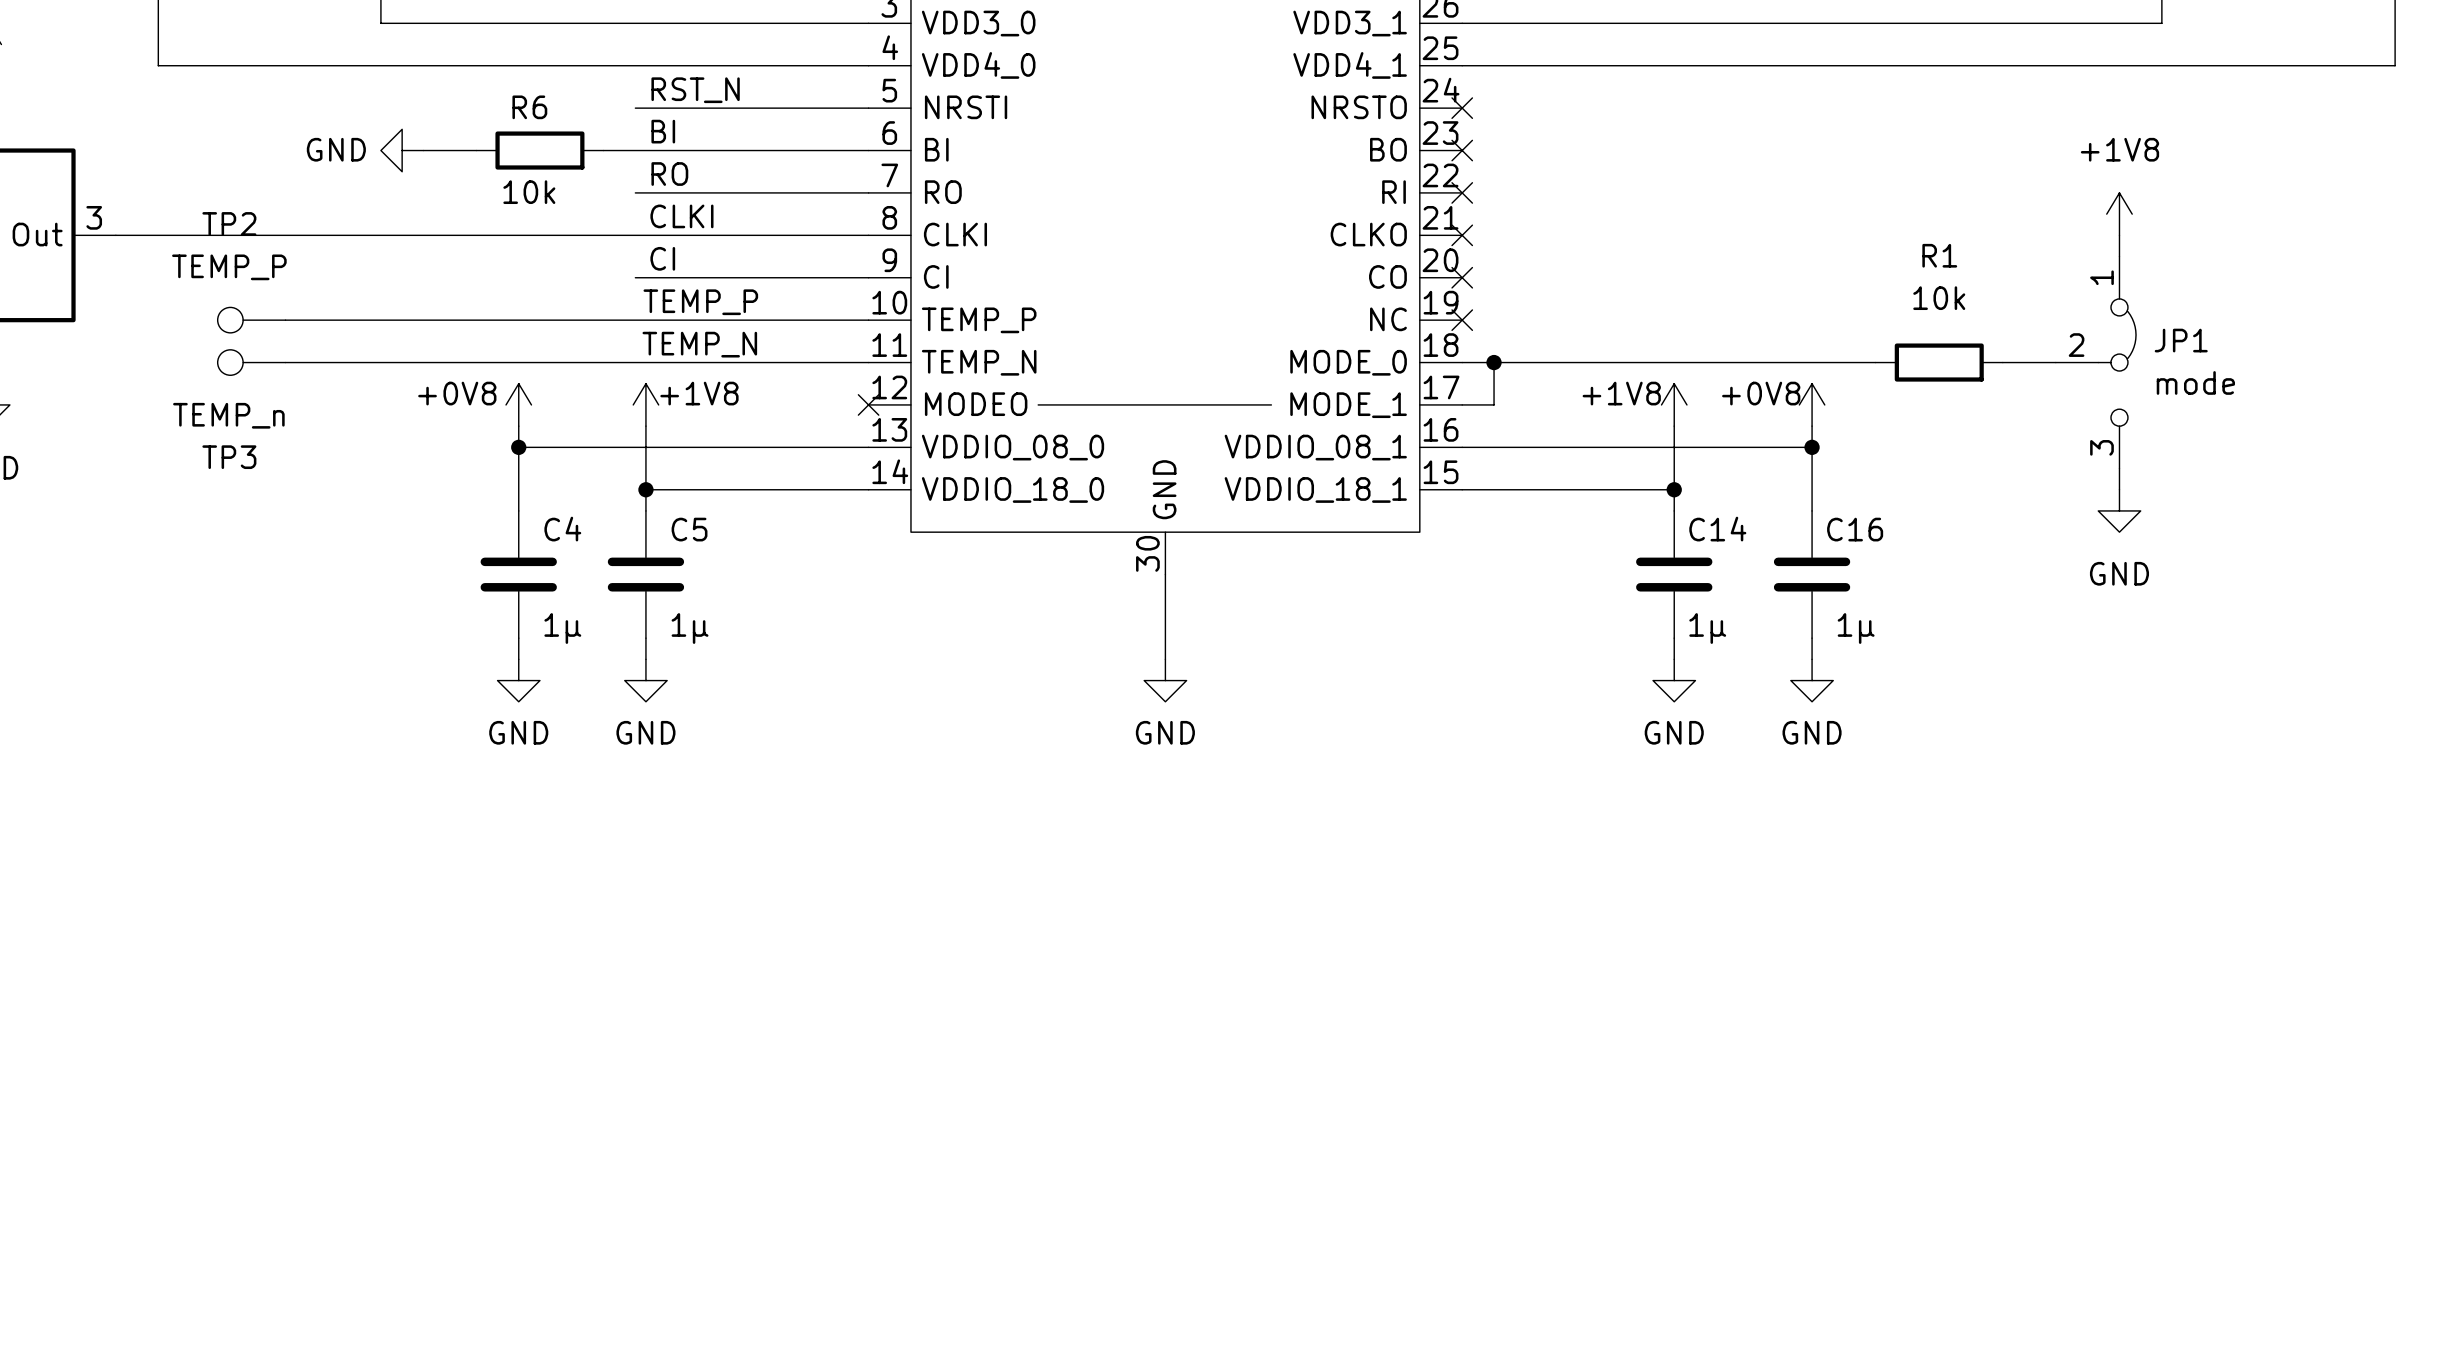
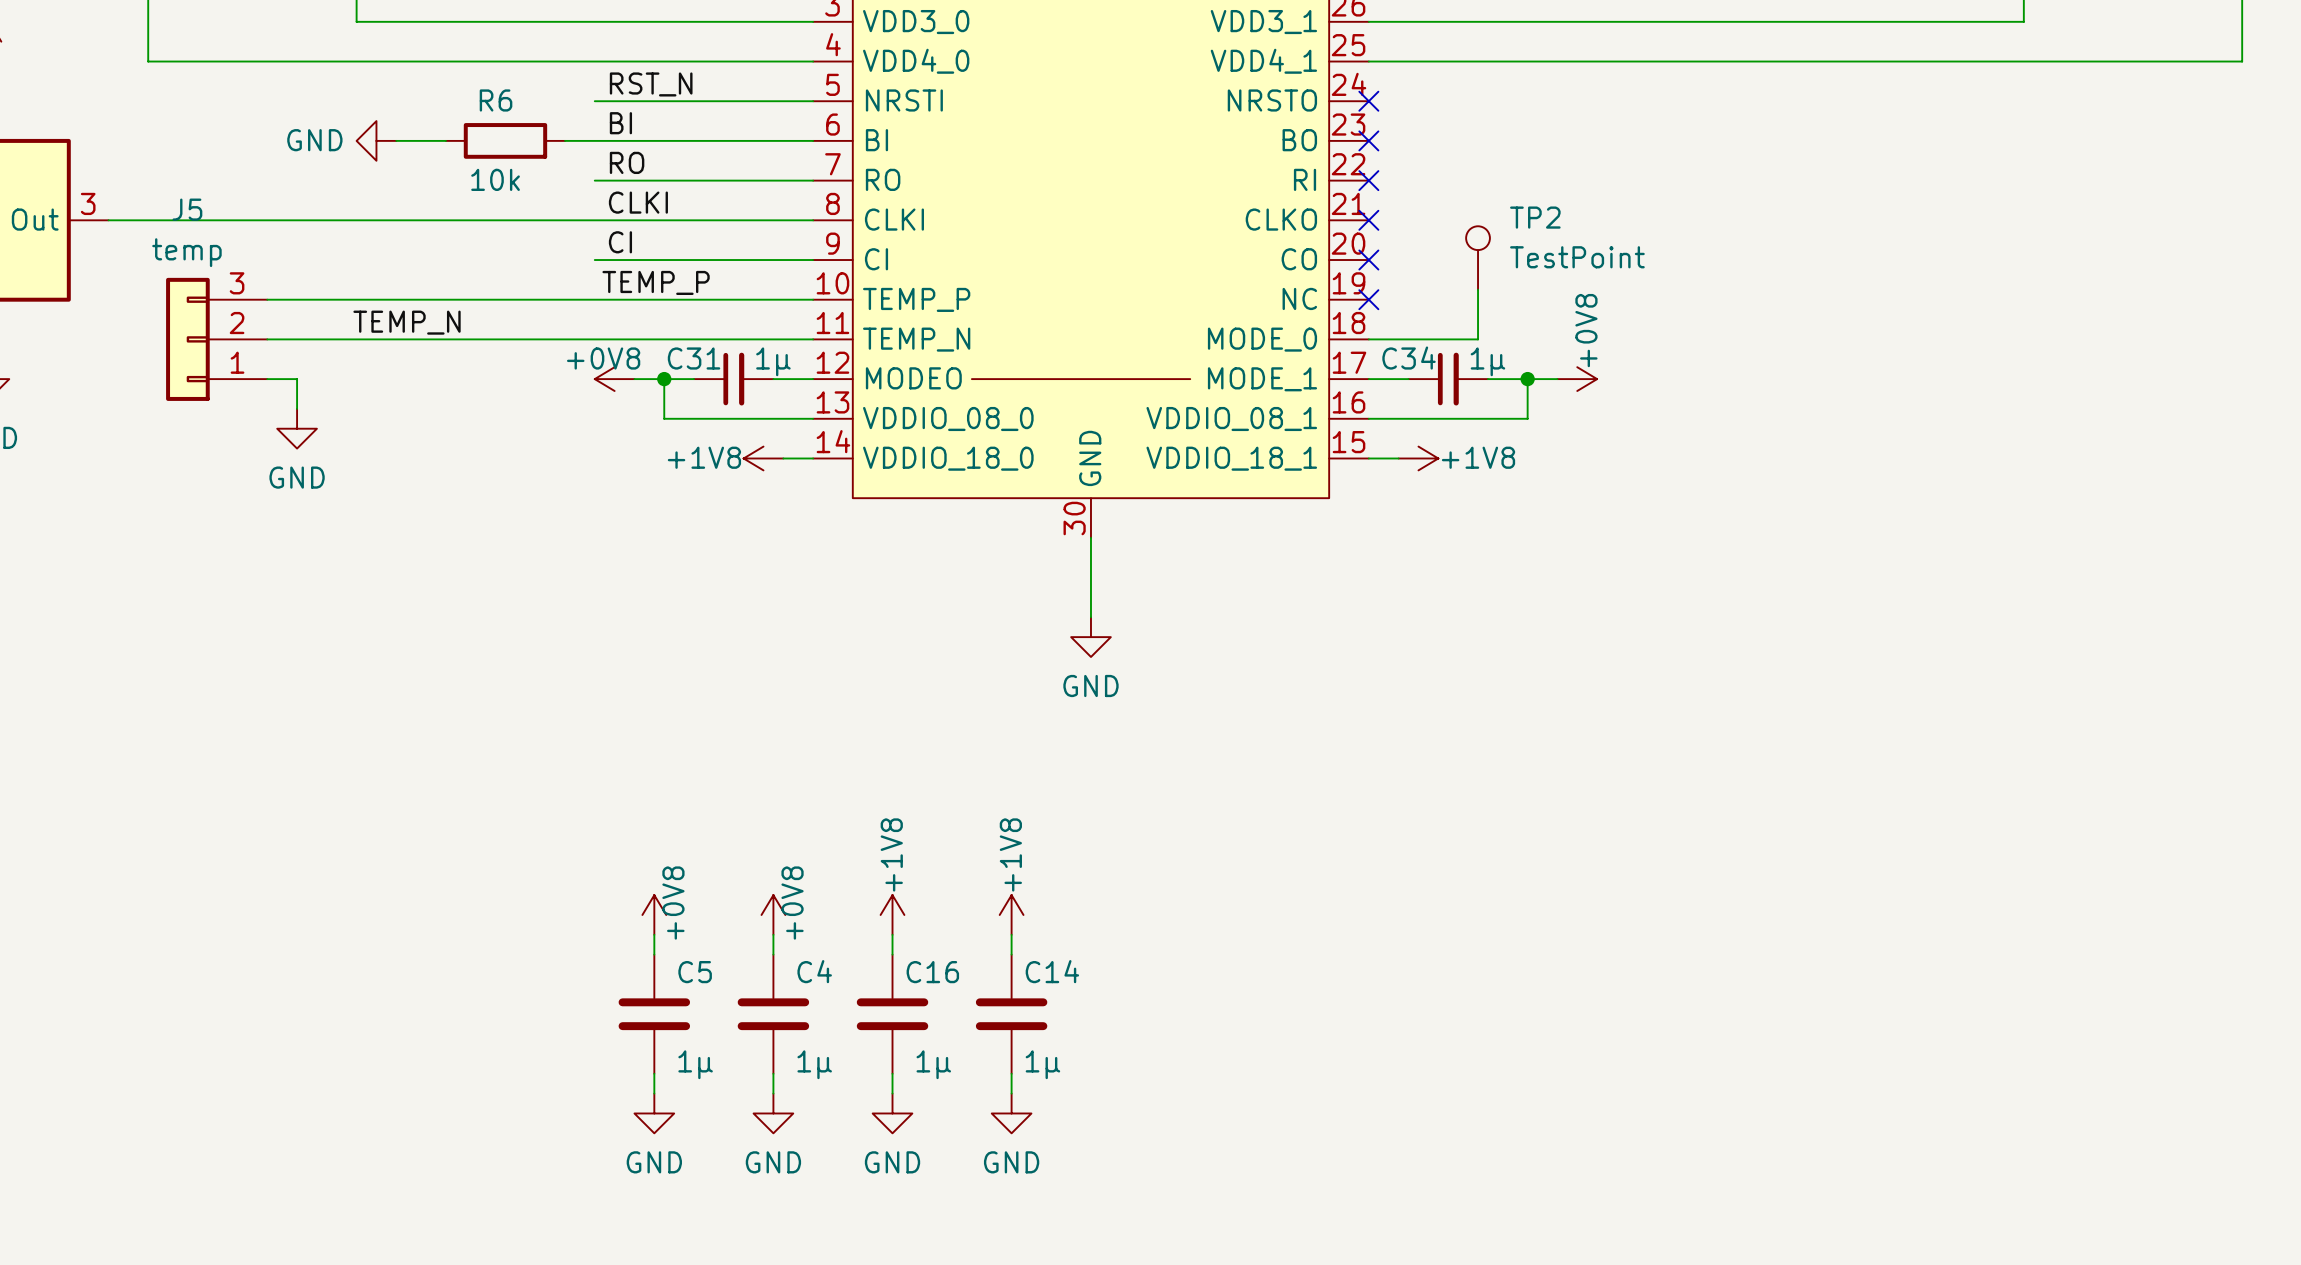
power symbol: +1V8 (2119, 214) -> none
TP2 name position: TP2 (229, 223) -> TP2 (1535, 217)
wire: (2119, 235) (2119, 256) -> none
TP2 value: TEMP_P (229, 267) -> TestPoint (1577, 257)
TP2 rotation: 0° (230, 320) -> 90° clockwise (1478, 238)
TP2 position: (251, 320) -> (1478, 258)
label position: TEMP_N (699, 344) -> TEMP_N (407, 322)
J5: none -> temp (216, 339)
TP3: TEMP_n (251, 362) -> none
wire: (1494, 362) (1494, 404) -> (1408, 379) (1398, 379)
junction: (1494, 362) -> none
wire: (1578, 362) (1875, 362) -> (1478, 339) (1478, 289)
R1: 10k (1939, 362) -> none
wire: (2002, 362) (2055, 362) -> none
JP1: mode (2095, 362) -> none
part value position: +0V8 (457, 393) -> +0V8 (603, 358)
power symbol text position: +1V8 (699, 393) -> +1V8 (704, 457)
power symbol text position: +1V8 (1621, 393) -> +1V8 (1478, 457)
wire: none -> (267, 379) (297, 379) (297, 408)
part rotation: 0° (518, 404) -> 90° counterclockwise (614, 379)
part position: (518, 404) -> (614, 379)
power symbol rotation: 0° (645, 404) -> 90° counterclockwise (763, 458)
power symbol position: +1V8 (645, 404) -> +1V8 (763, 458)
wire: none -> (634, 379) (694, 379)
junction: none -> (664, 379)
C31: none -> 1µ (733, 379)
wire: none -> (773, 379) (813, 379)
no-connect mark: (868, 404) -> none
C34: none -> 1µ (1448, 379)
wire: none -> (1487, 379) (1557, 379)
junction: none -> (1527, 379)
power symbol rotation: 0° (1674, 404) -> 90° clockwise (1418, 458)
power symbol position: +1V8 (1674, 404) -> +1V8 (1418, 458)
part rotation: 0° (1812, 404) -> 90° clockwise (1577, 379)
part position: (1812, 404) -> (1577, 379)
wire: (518, 426) (518, 510) -> none
wire: (645, 426) (645, 510) -> none
wire: (1674, 426) (1674, 510) -> none
wire: (1812, 426) (1812, 510) -> none
wire: (518, 447) (709, 447) -> (664, 379) (664, 418)
junction: (518, 447) -> none
wire: (1631, 447) (1812, 447) -> (1527, 418) (1527, 379)
junction: (1812, 447) -> none
power symbol: none -> GND (297, 428)
wire: (2119, 468) (2119, 489) -> none
wire: (645, 489) (836, 489) -> none
junction: (645, 489) -> none
wire: (1494, 489) (1674, 489) -> none
junction: (1674, 489) -> none
power symbol: GND (2119, 510) -> none
C4 position: (518, 574) -> (773, 1014)
C5 position: (645, 574) -> (654, 1014)
C14 position: (1674, 574) -> (1011, 1014)
C16 position: (1812, 574) -> (892, 1014)
wire: (518, 638) (518, 659) -> (654, 934) (654, 954)
wire: (645, 638) (645, 659) -> (773, 934) (773, 954)
wire: (1674, 638) (1674, 659) -> none
wire: (1812, 638) (1812, 659) -> none
power symbol: GND (518, 680) -> none
power symbol: GND (645, 680) -> none
power symbol: GND (1674, 680) -> none
power symbol: GND (1812, 680) -> none
part: none -> +0V8 (654, 914)
part: none -> +0V8 (773, 914)
power symbol: none -> +1V8 (892, 914)
power symbol: none -> +1V8 (1011, 914)
wire: none -> (892, 934) (892, 954)
wire: none -> (1011, 934) (1011, 954)
wire: none -> (654, 1073) (654, 1093)
wire: none -> (773, 1073) (773, 1093)
wire: none -> (892, 1073) (892, 1093)
wire: none -> (1011, 1073) (1011, 1093)
power symbol: none -> GND (654, 1113)
power symbol: none -> GND (773, 1113)
power symbol: none -> GND (892, 1113)
power symbol: none -> GND (1011, 1113)

